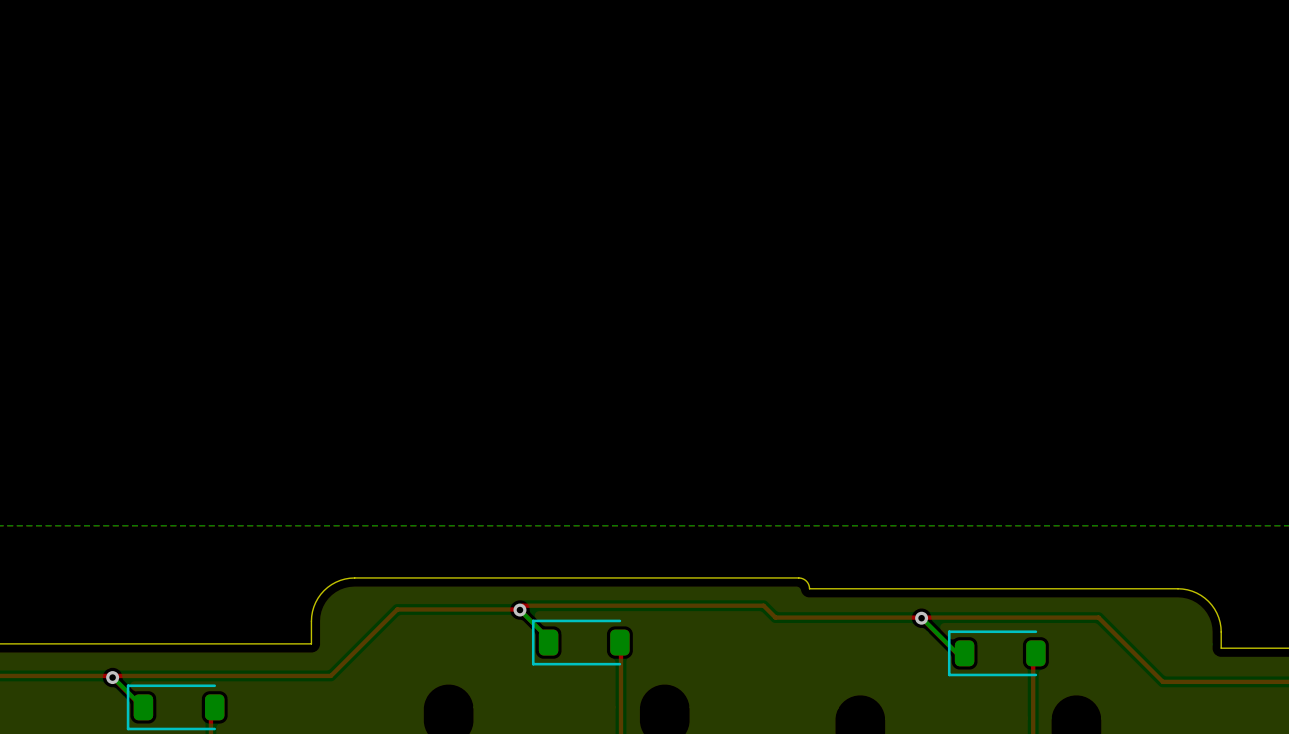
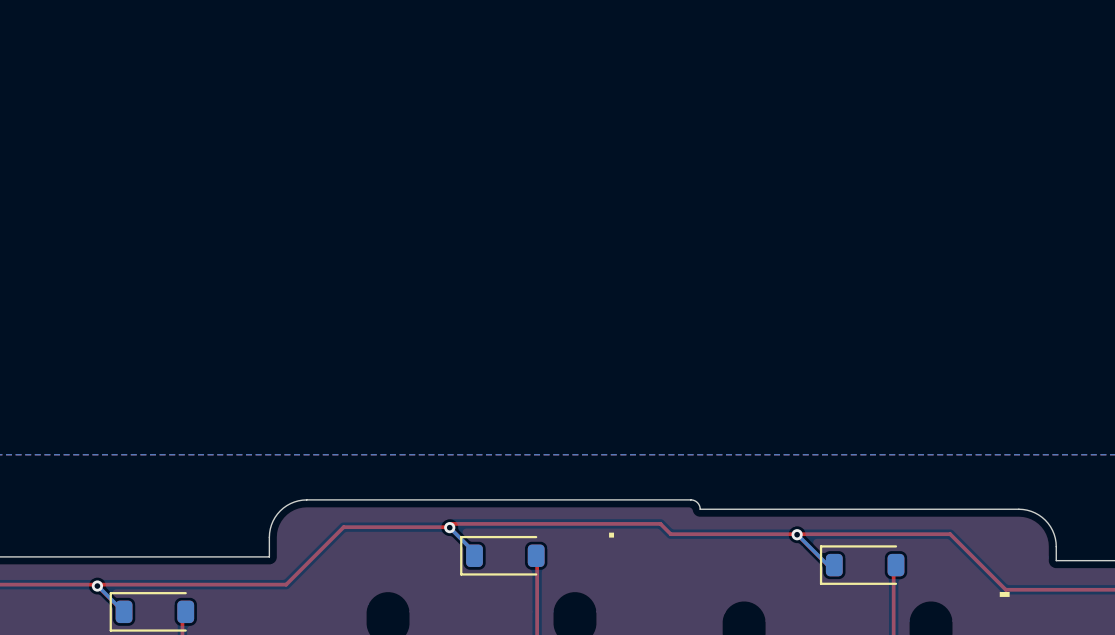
drawing: none -> [609, 532, 615, 538]
drawing: none -> [999, 592, 1010, 597]

